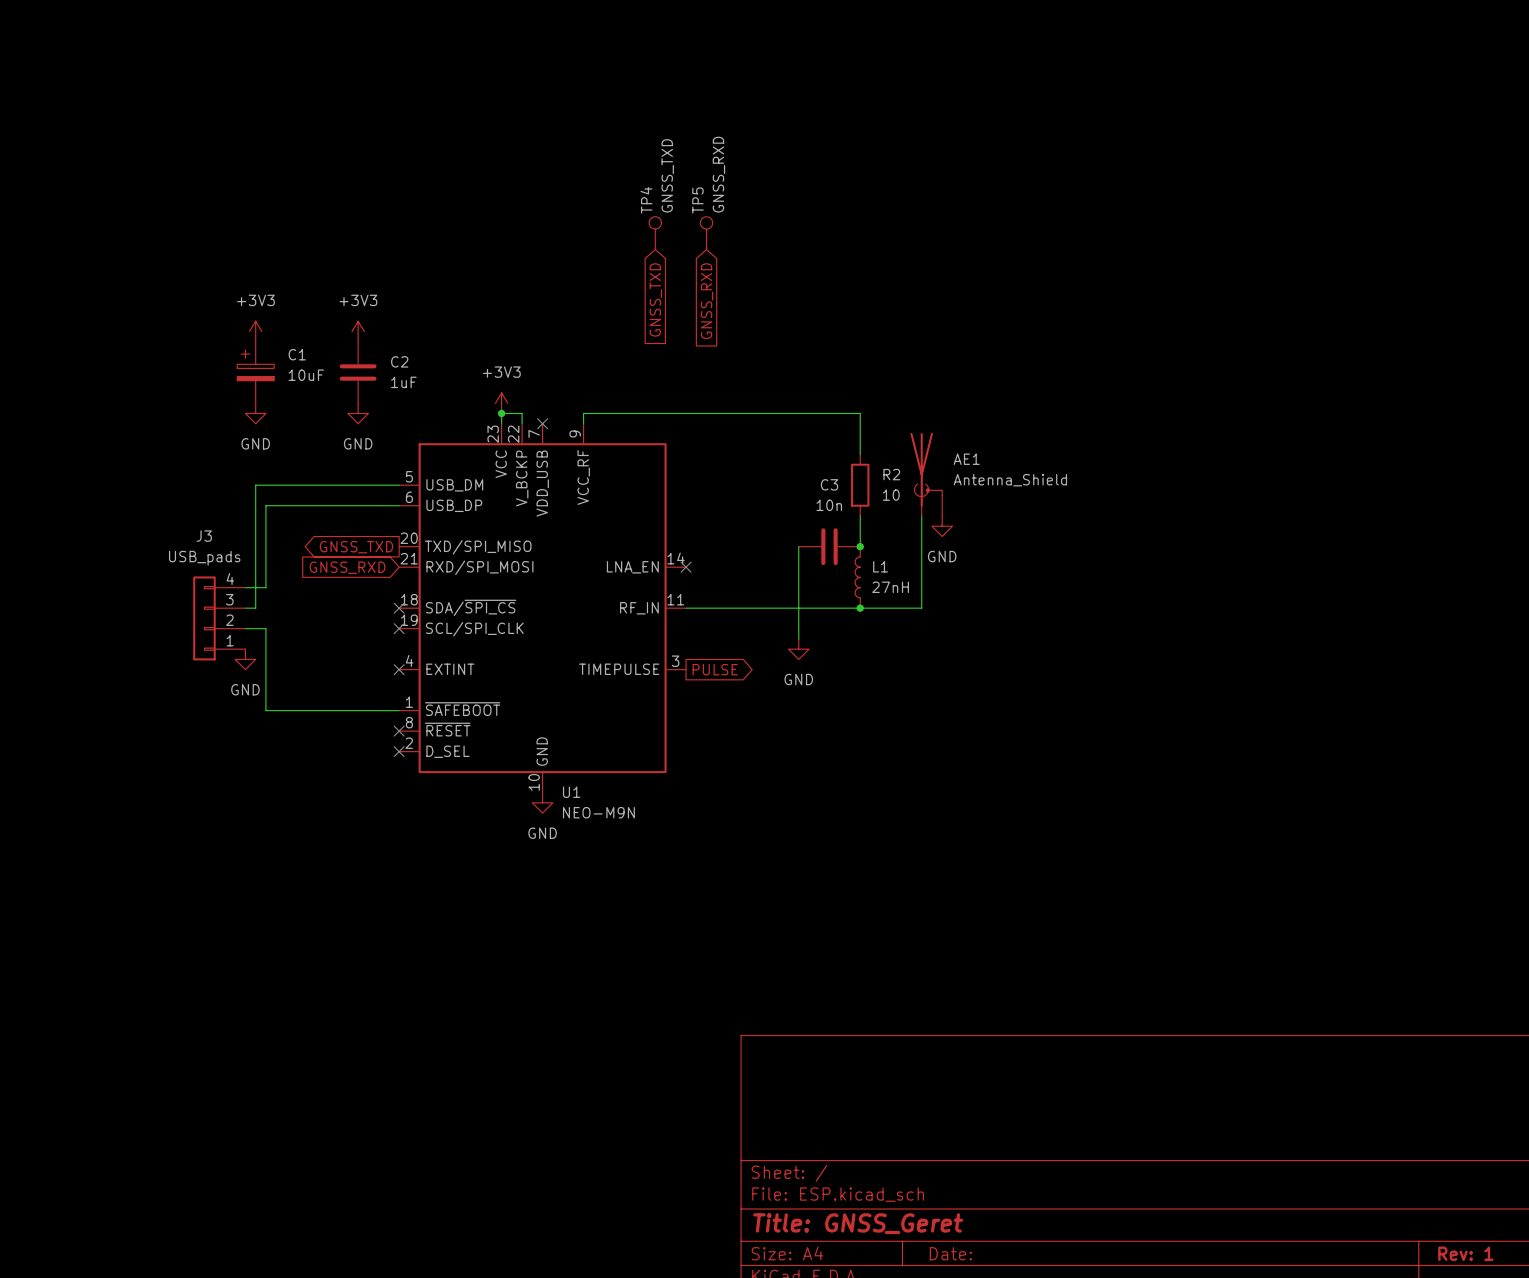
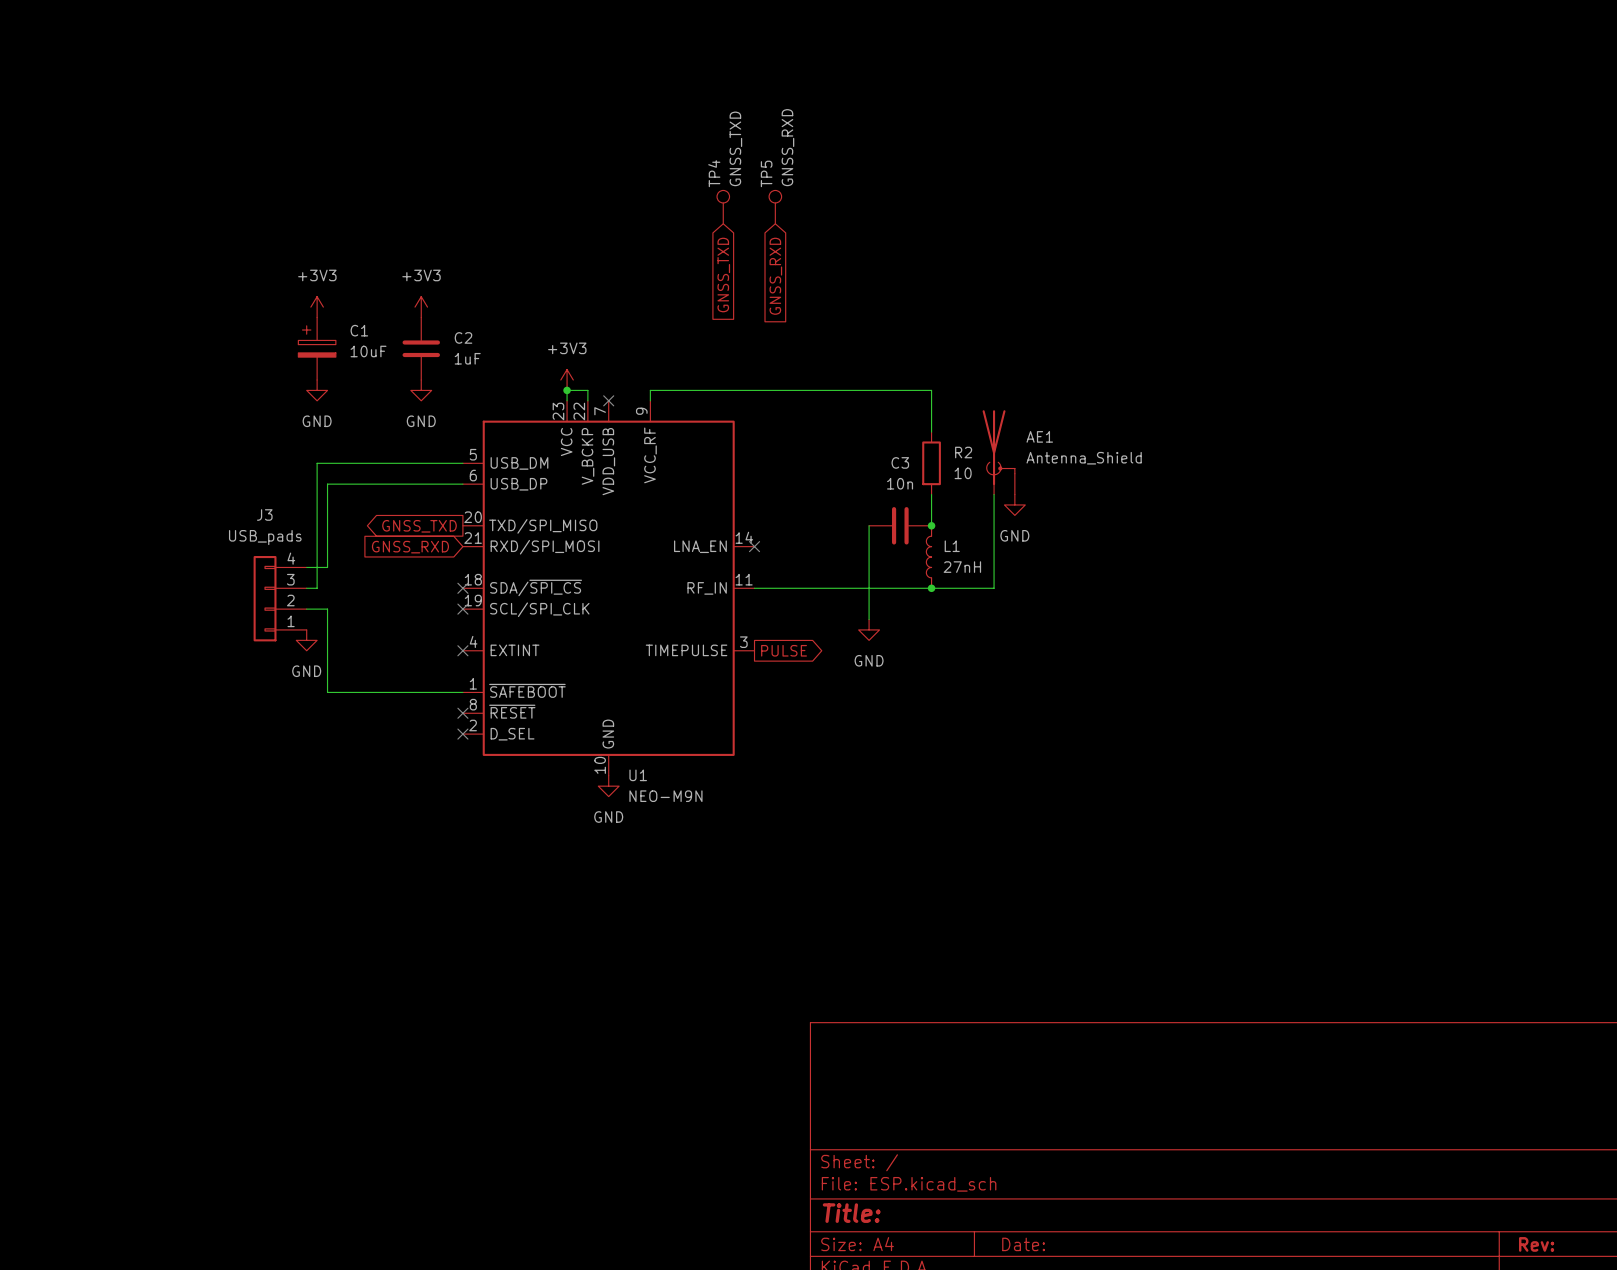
title block: Title: GNSS_Geret (858, 1223) -> Title: (851, 1213)
title block: Rev: 1 (1465, 1253) -> Rev: (1536, 1244)

